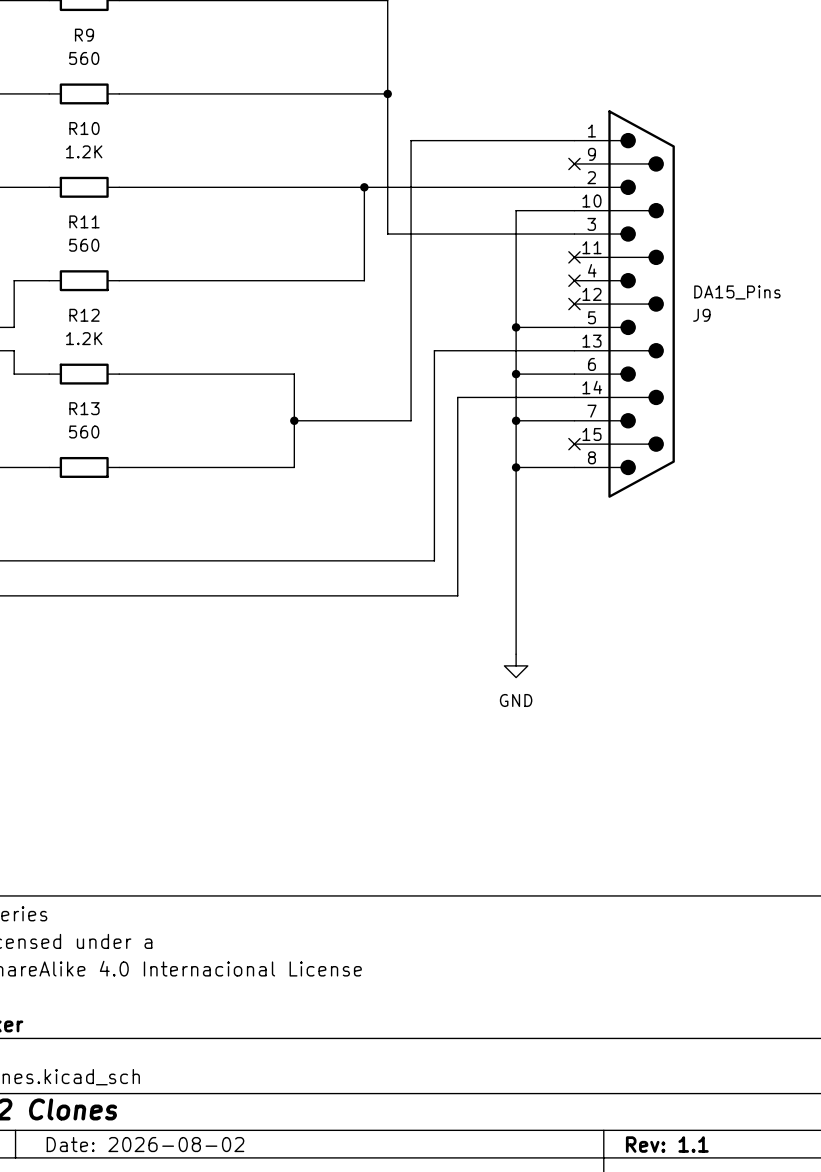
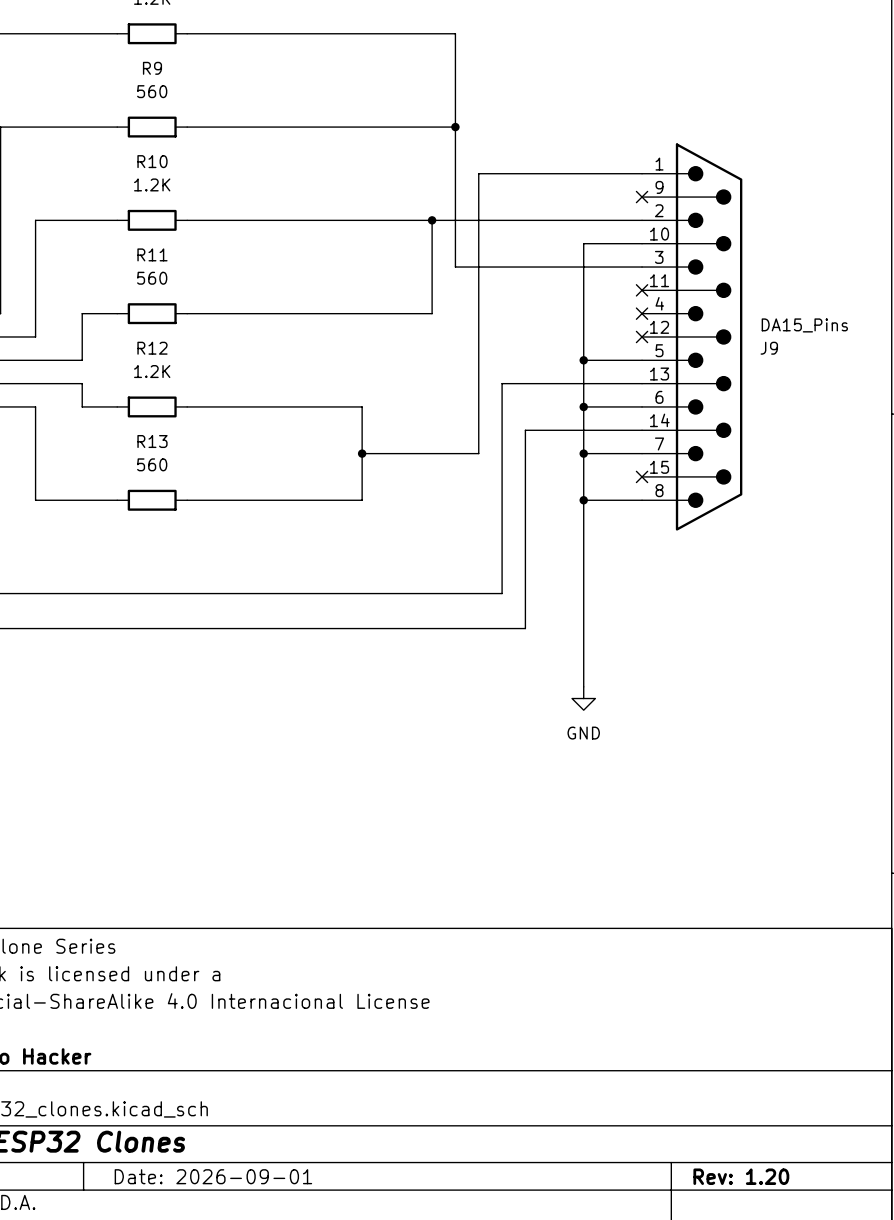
title block: Date: 2026-08-02 (145, 1144) -> Date: 2026-09-01 (213, 1176)
title block: Rev: 1.1 (667, 1144) -> Rev: 1.20 (741, 1176)

